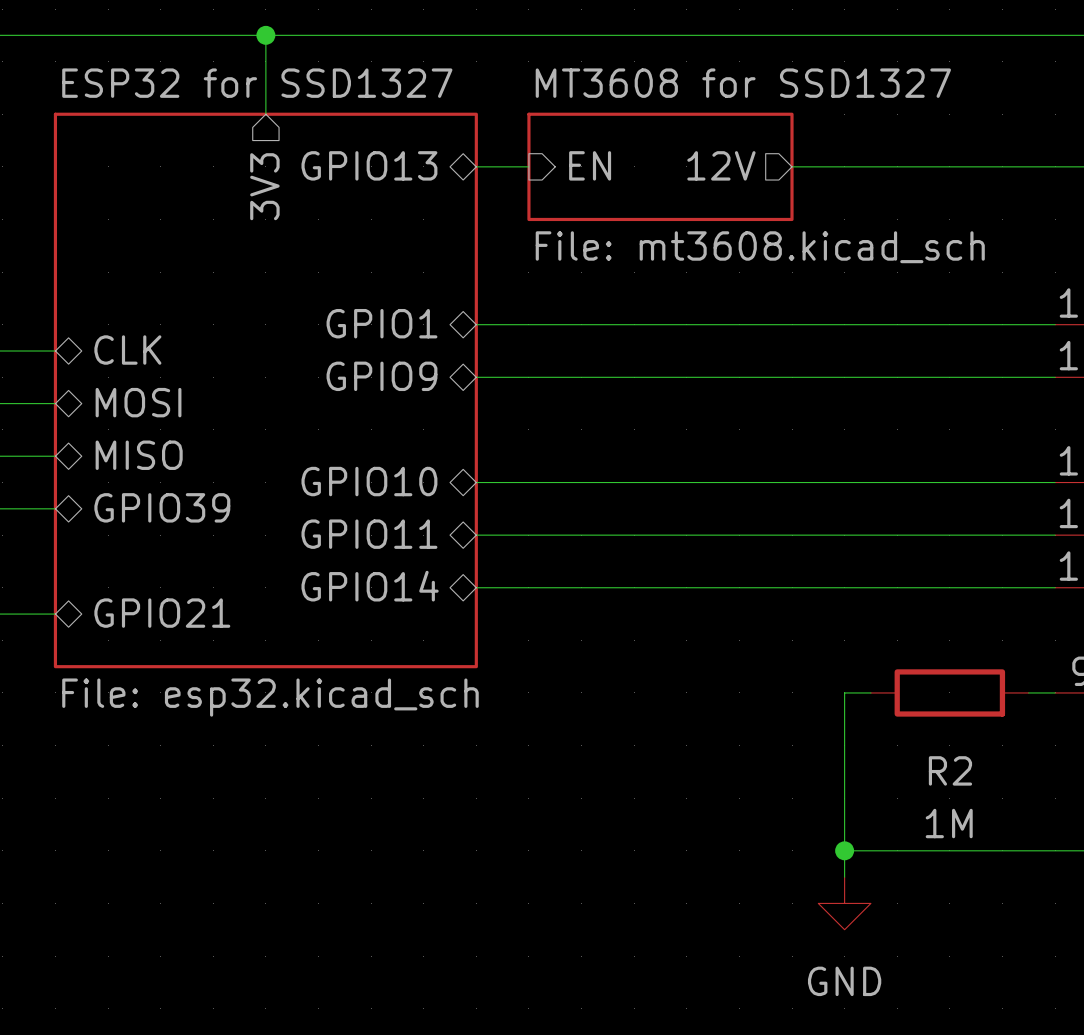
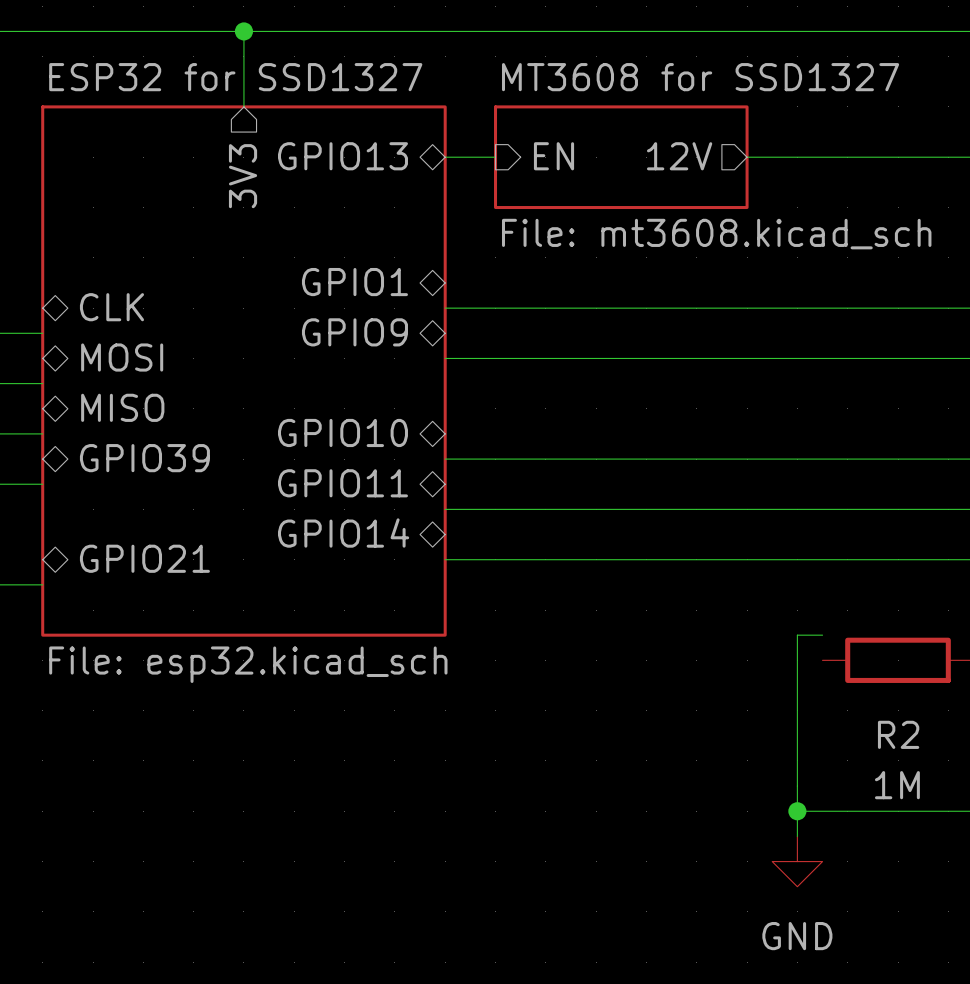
sheet pin position: GPIO1 (381, 323) -> GPIO1 (354, 282)
sheet pin position: CLK (127, 350) -> CLK (111, 307)
sheet pin position: GPIO9 (381, 376) -> GPIO9 (354, 332)
sheet pin position: MOSI (138, 402) -> MOSI (122, 357)
sheet pin position: MISO (139, 455) -> MISO (122, 407)
sheet pin position: GPIO10 (369, 481) -> GPIO10 (342, 432)
sheet pin position: GPIO39 (162, 507) -> GPIO39 (144, 458)
sheet pin position: GPIO11 (369, 534) -> GPIO11 (342, 483)
sheet pin position: GPIO14 (370, 586) -> GPIO14 (343, 533)
sheet pin position: GPIO21 (162, 613) -> GPIO21 (144, 558)
wire: (844, 692) (870, 692) -> (797, 660) (797, 635) (822, 635)

